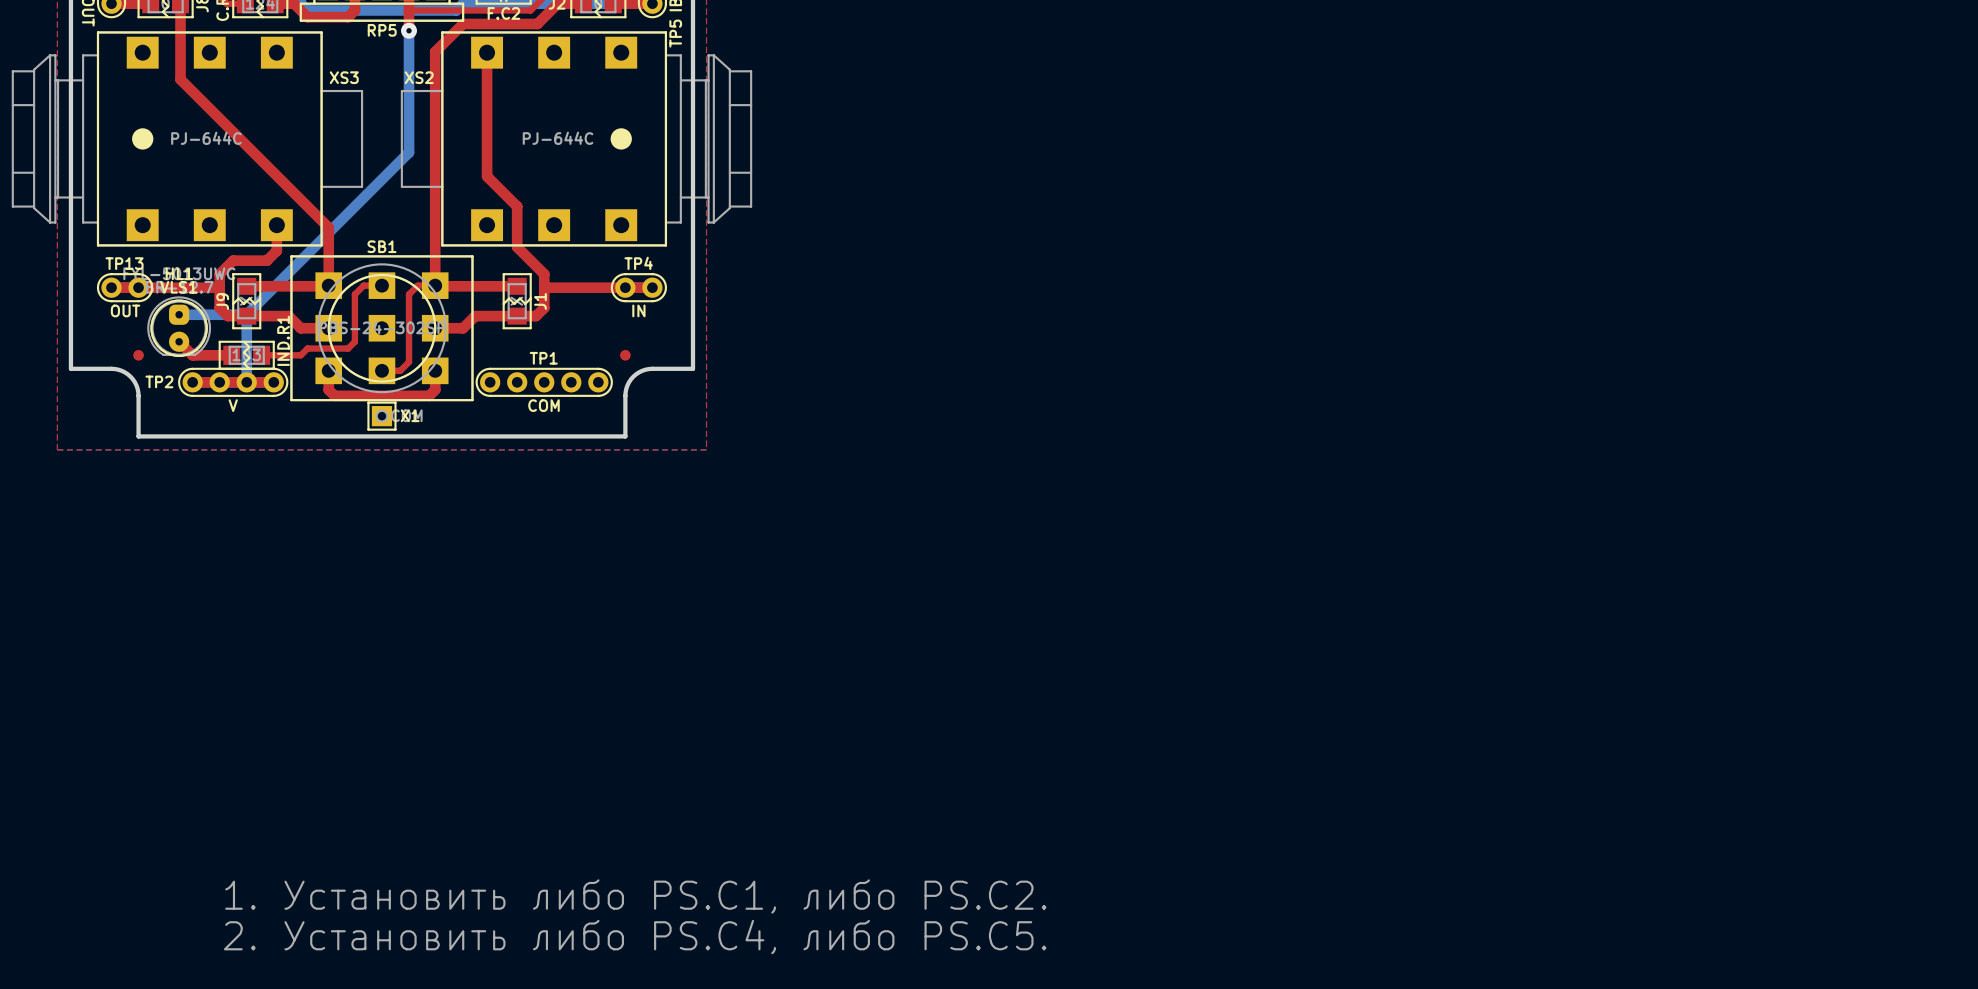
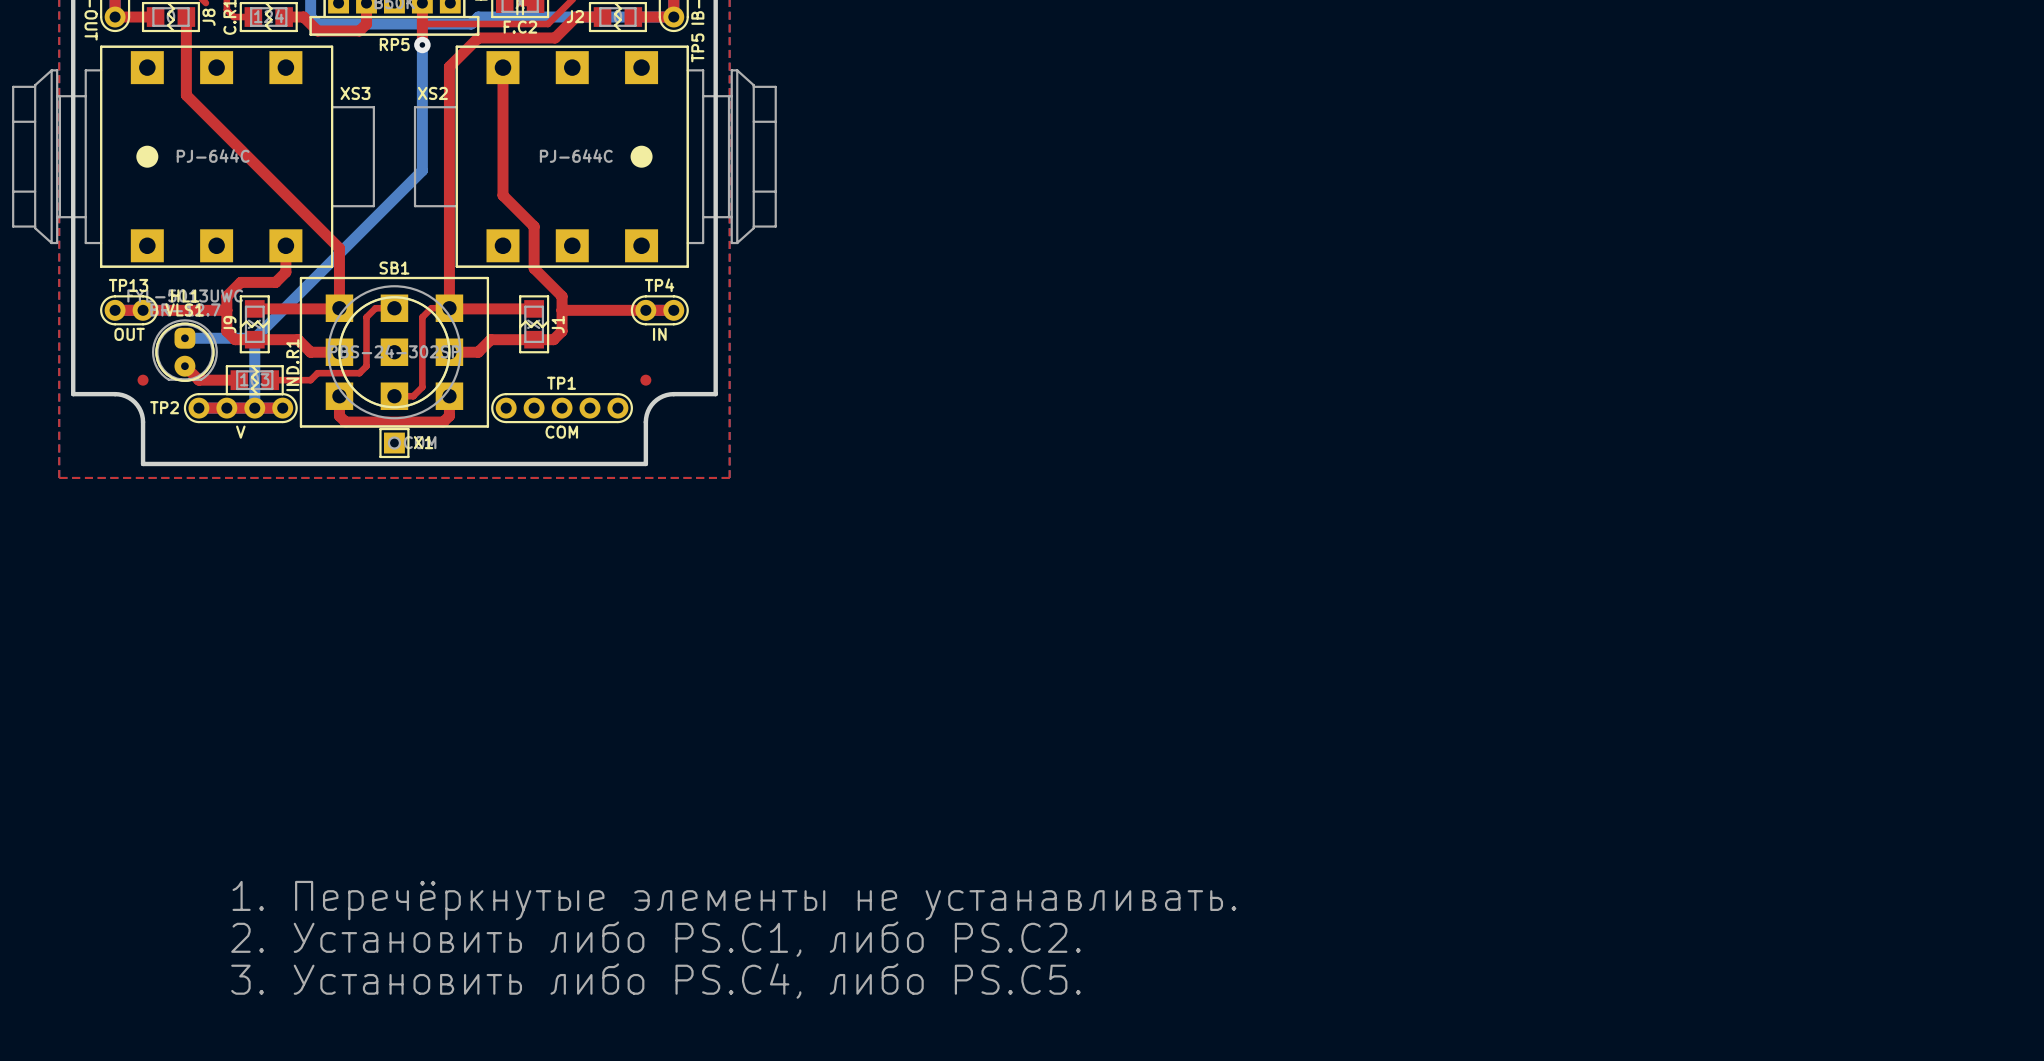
text: none -> 1. Перечёркнутые элементы не устанавливать. (734, 900)
text: 1. Установить либо PS.C1, либо PS.C2. (635, 896) -> 2. Установить либо PS.C1, либо PS.C2. (655, 939)
text: 2. Установить либо PS.C4, либо PS.C5. (635, 937) -> 3. Установить либо PS.C4, либо PS.C5. (655, 981)

